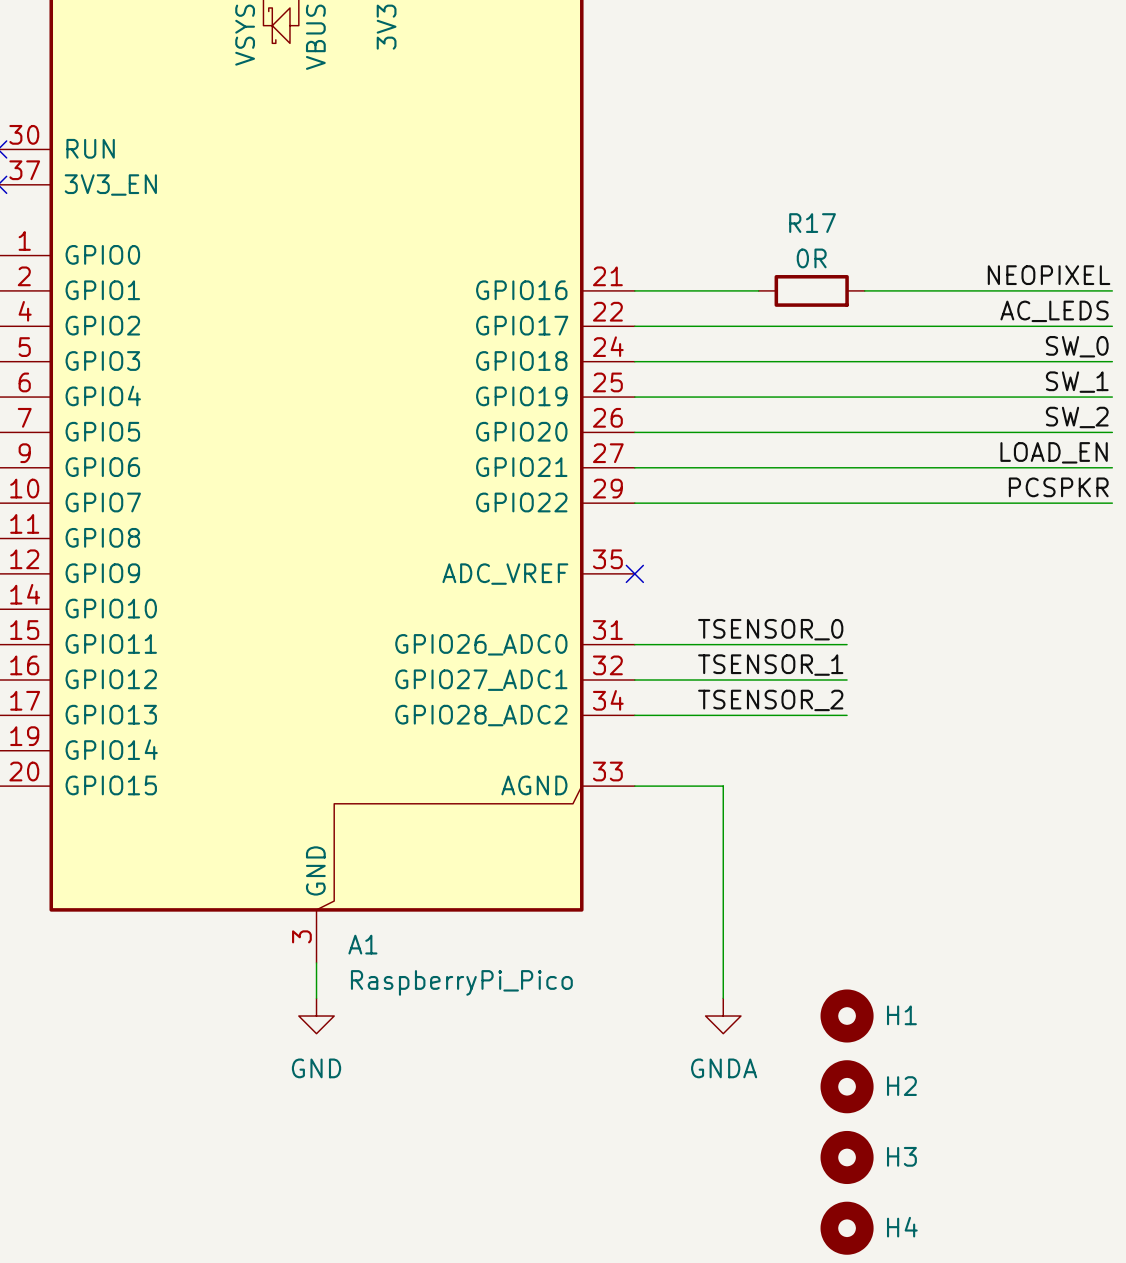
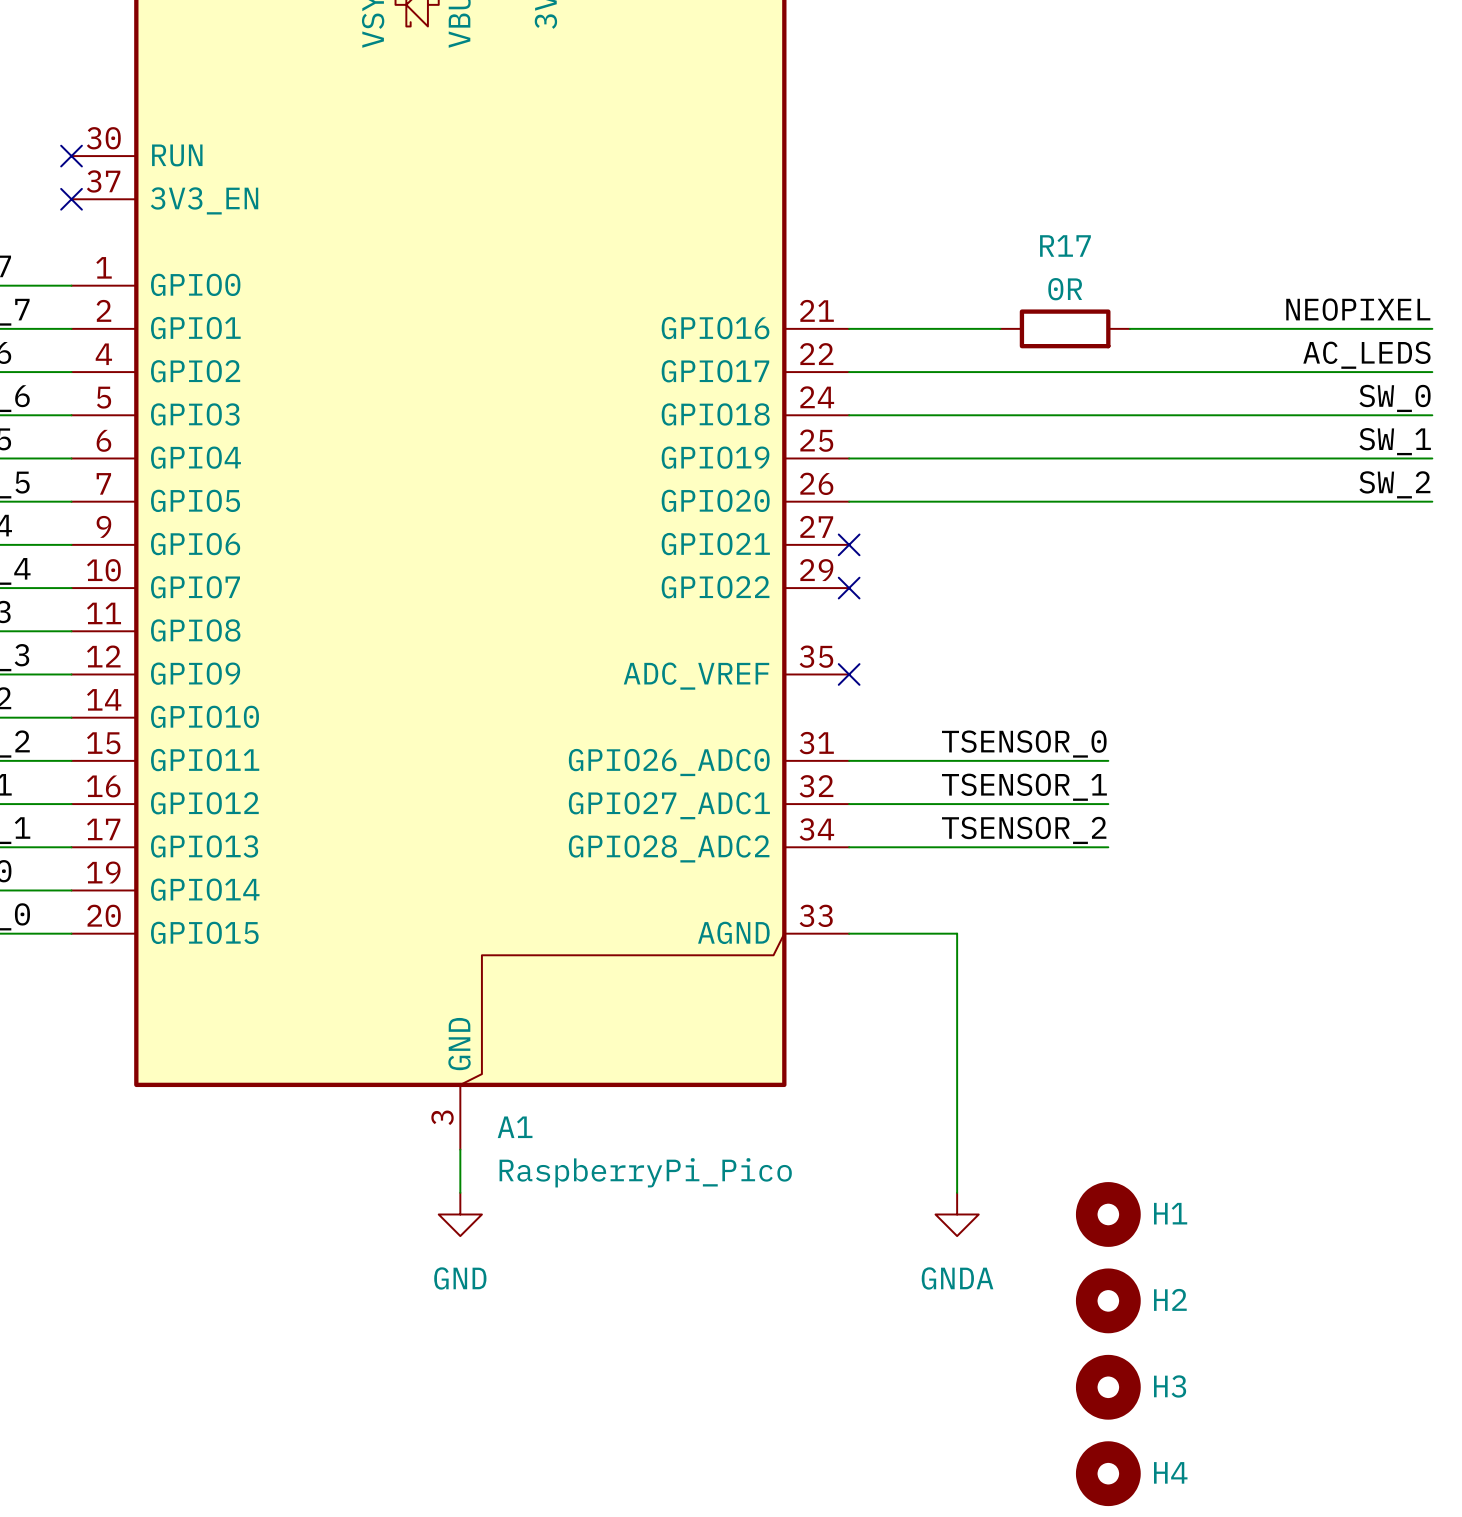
label: LOAD_EN (1054, 452) -> none
wire: (634, 467) (1112, 467) -> none
no-connect mark: none -> (849, 544)
label: PCSPKR (1058, 487) -> none
wire: (634, 503) (1112, 503) -> none
no-connect mark: none -> (849, 588)

